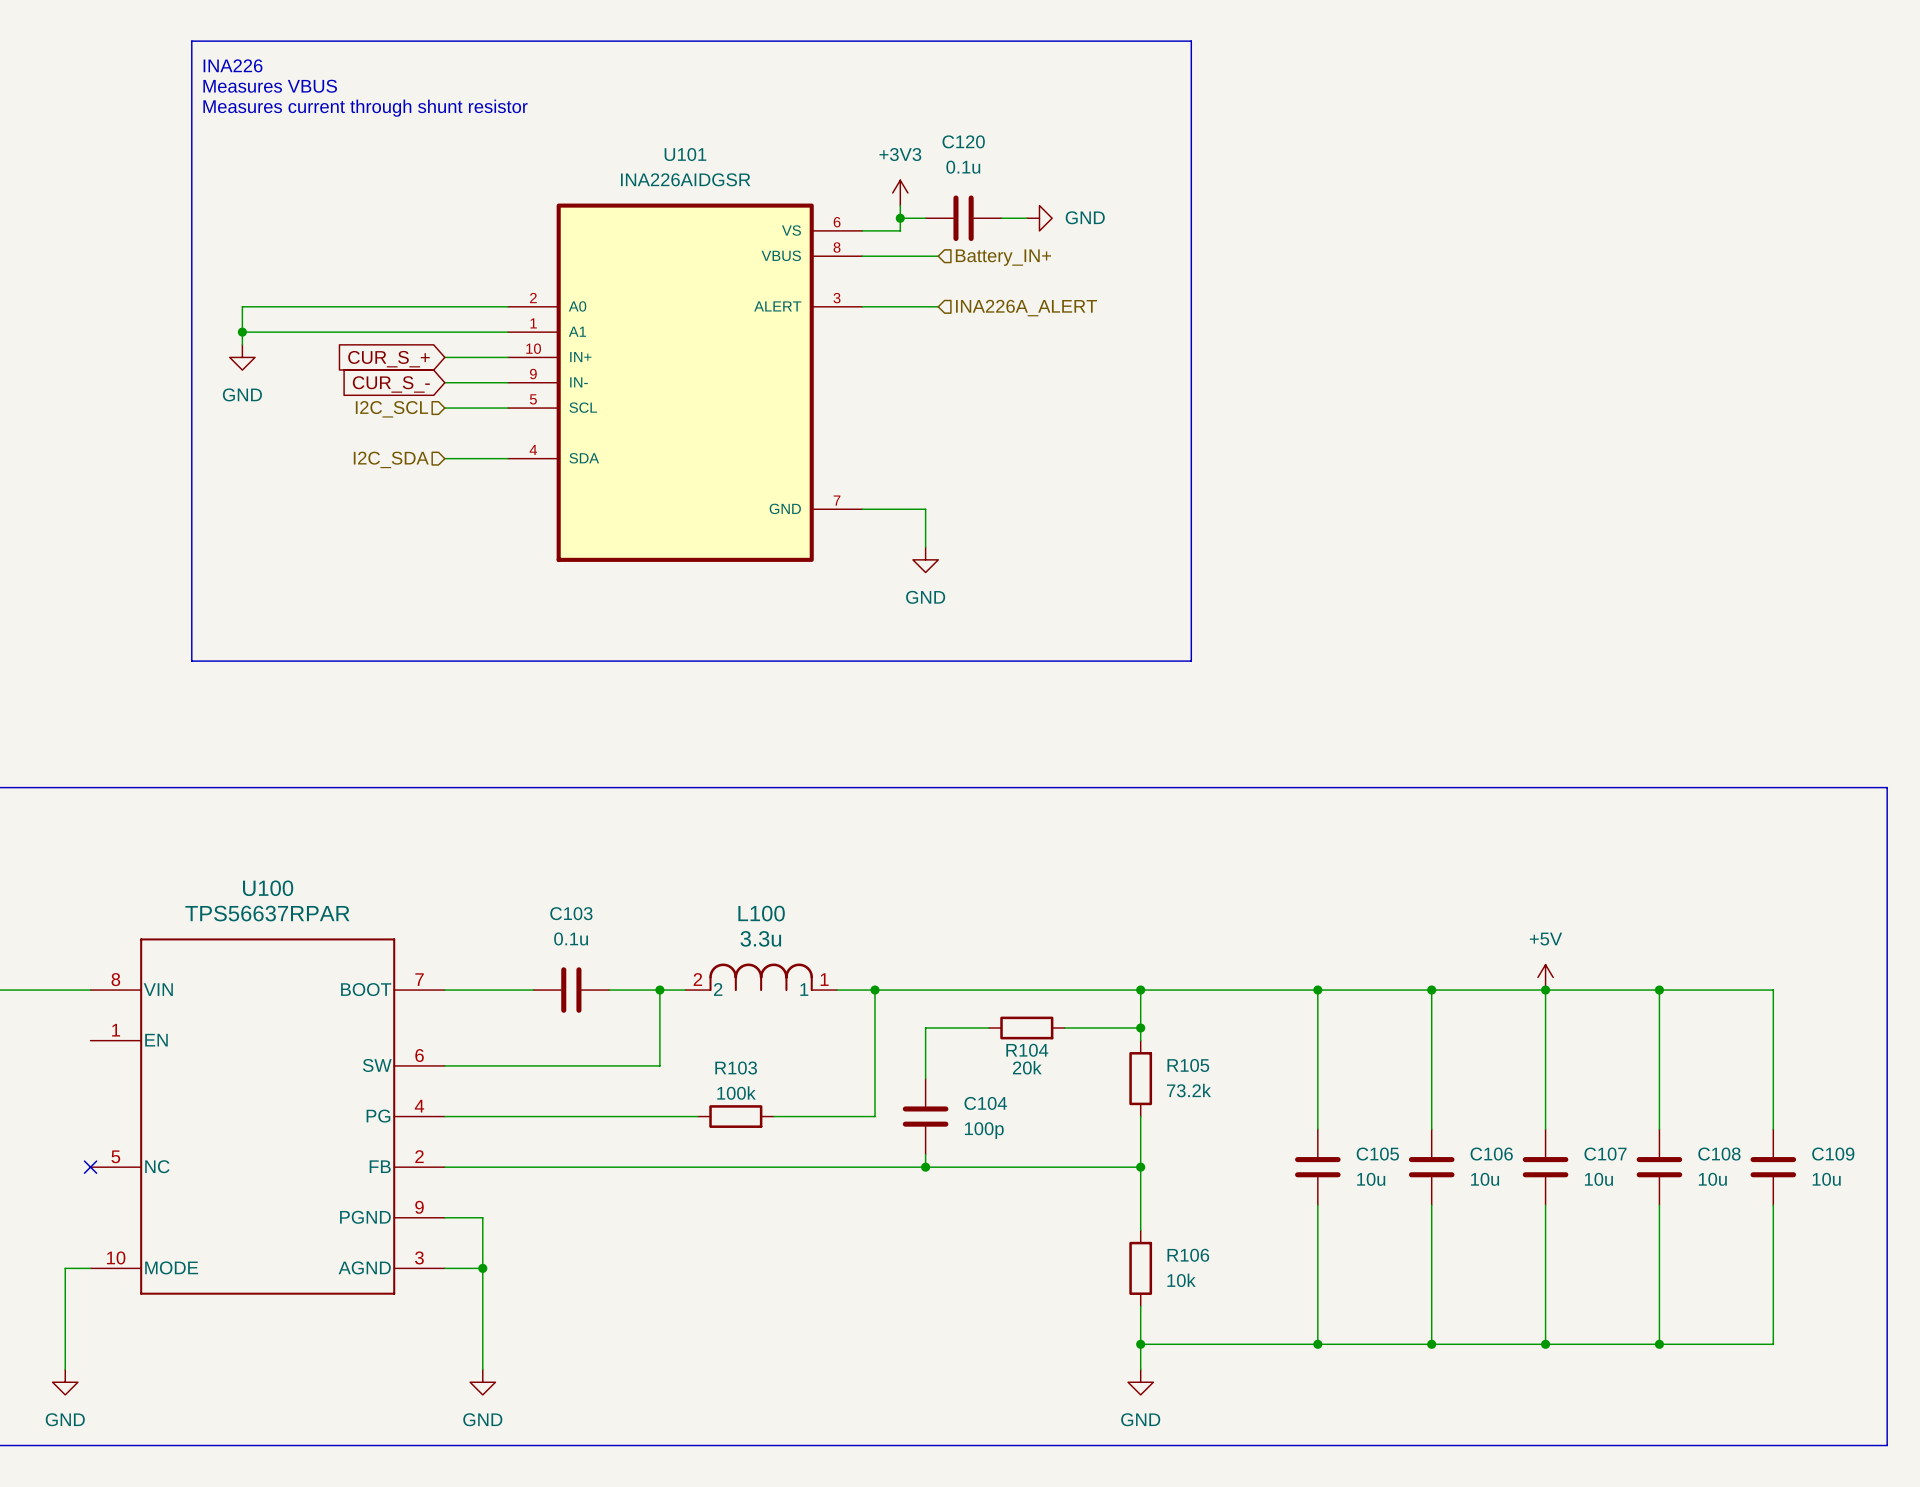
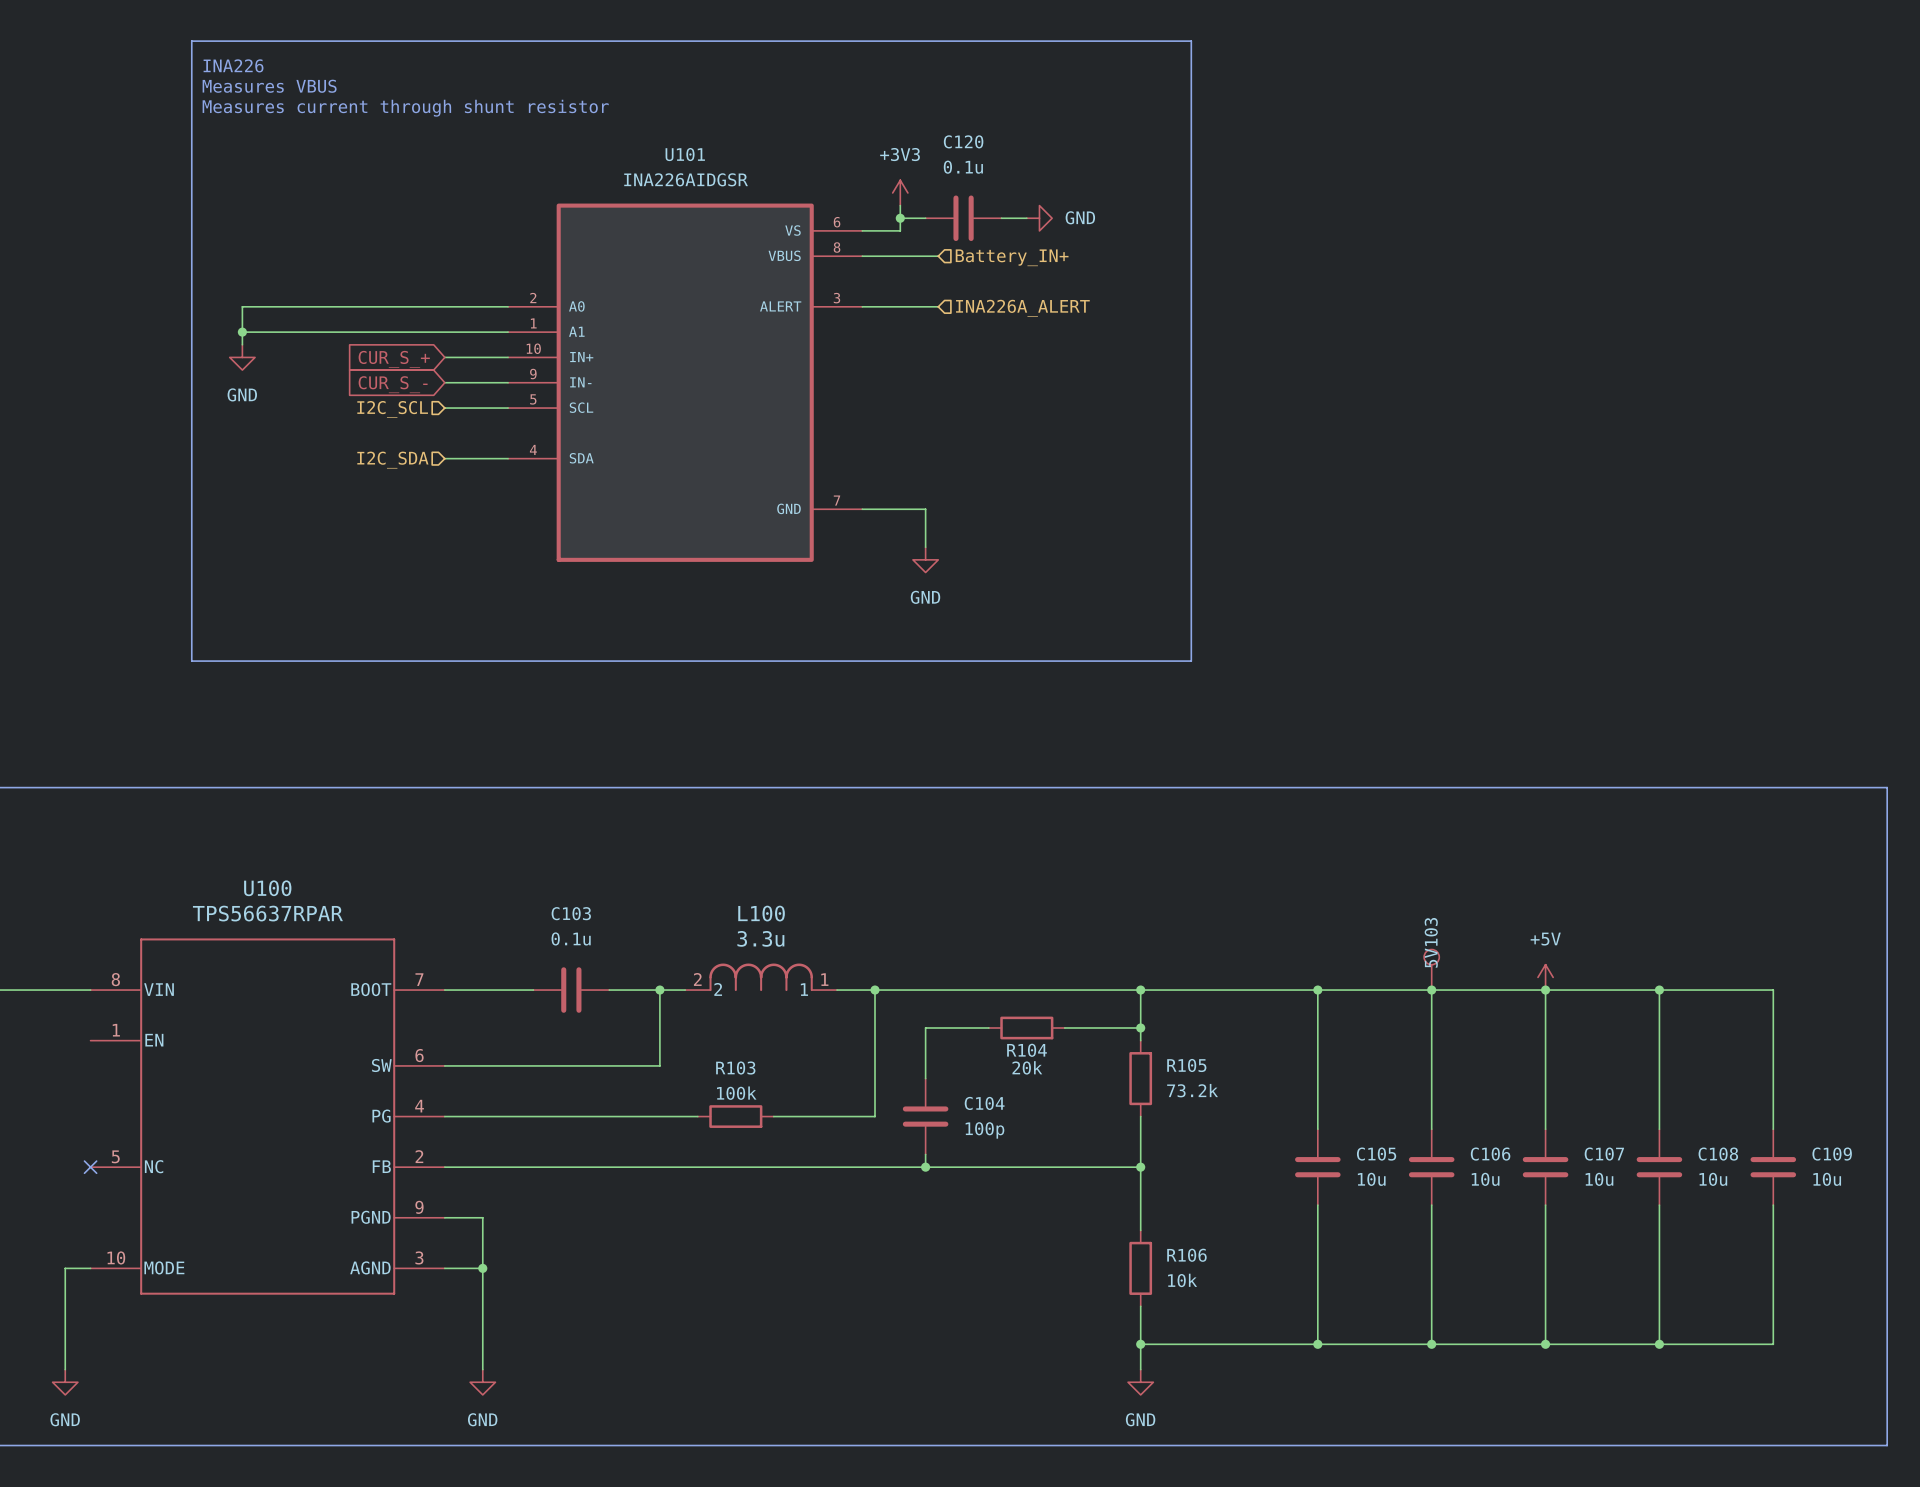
5V103: none -> (1431, 969)

